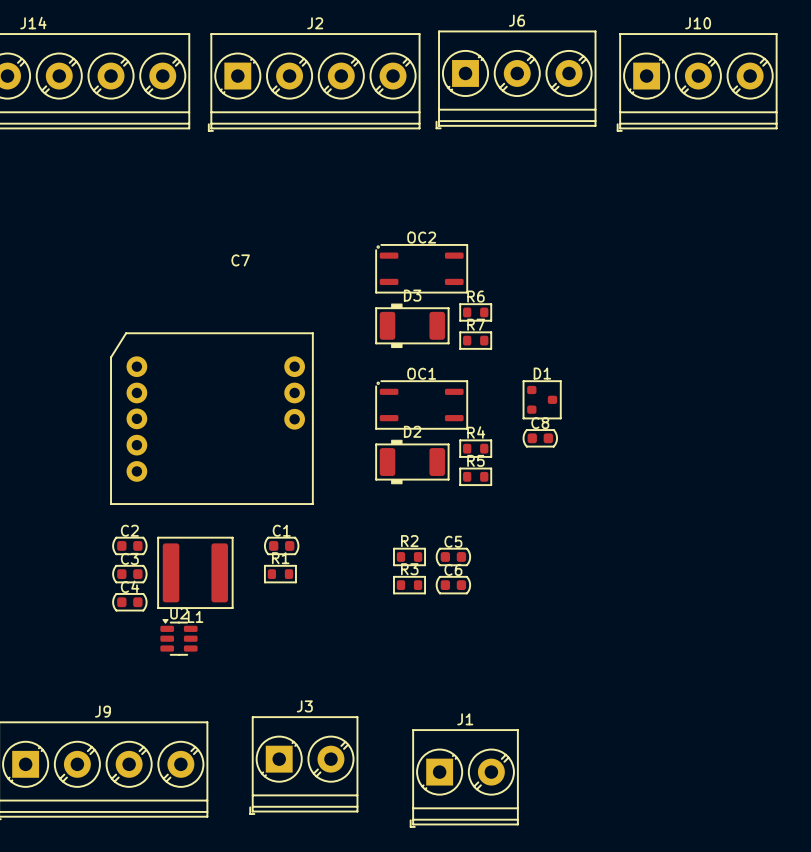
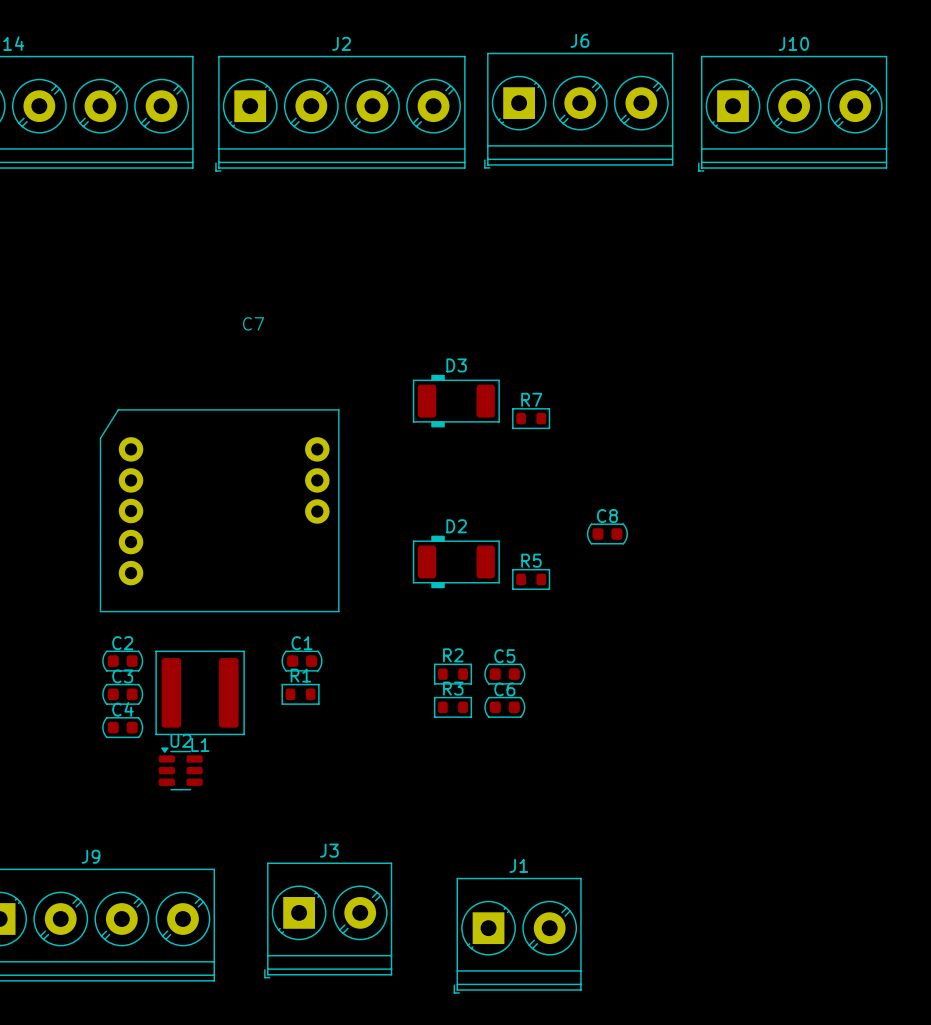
OC2: (421, 268) -> none
R6: (475, 312) -> none
D1: (542, 399) -> none
OC1: (421, 404) -> none
R4: (475, 448) -> none

